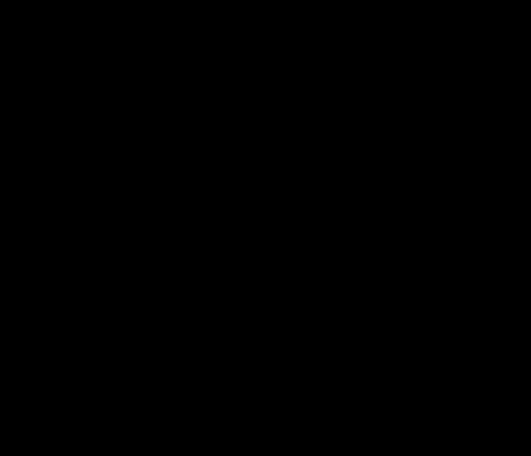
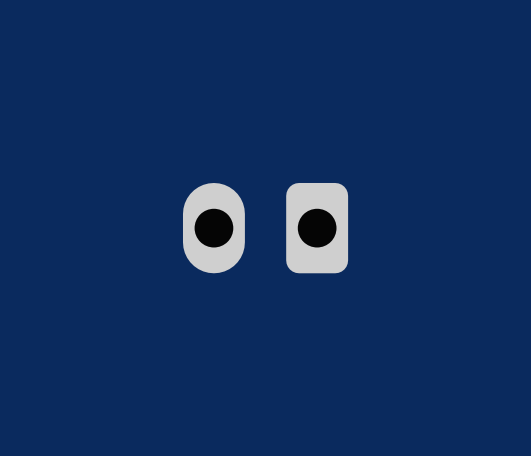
part: none -> (265, 228)

